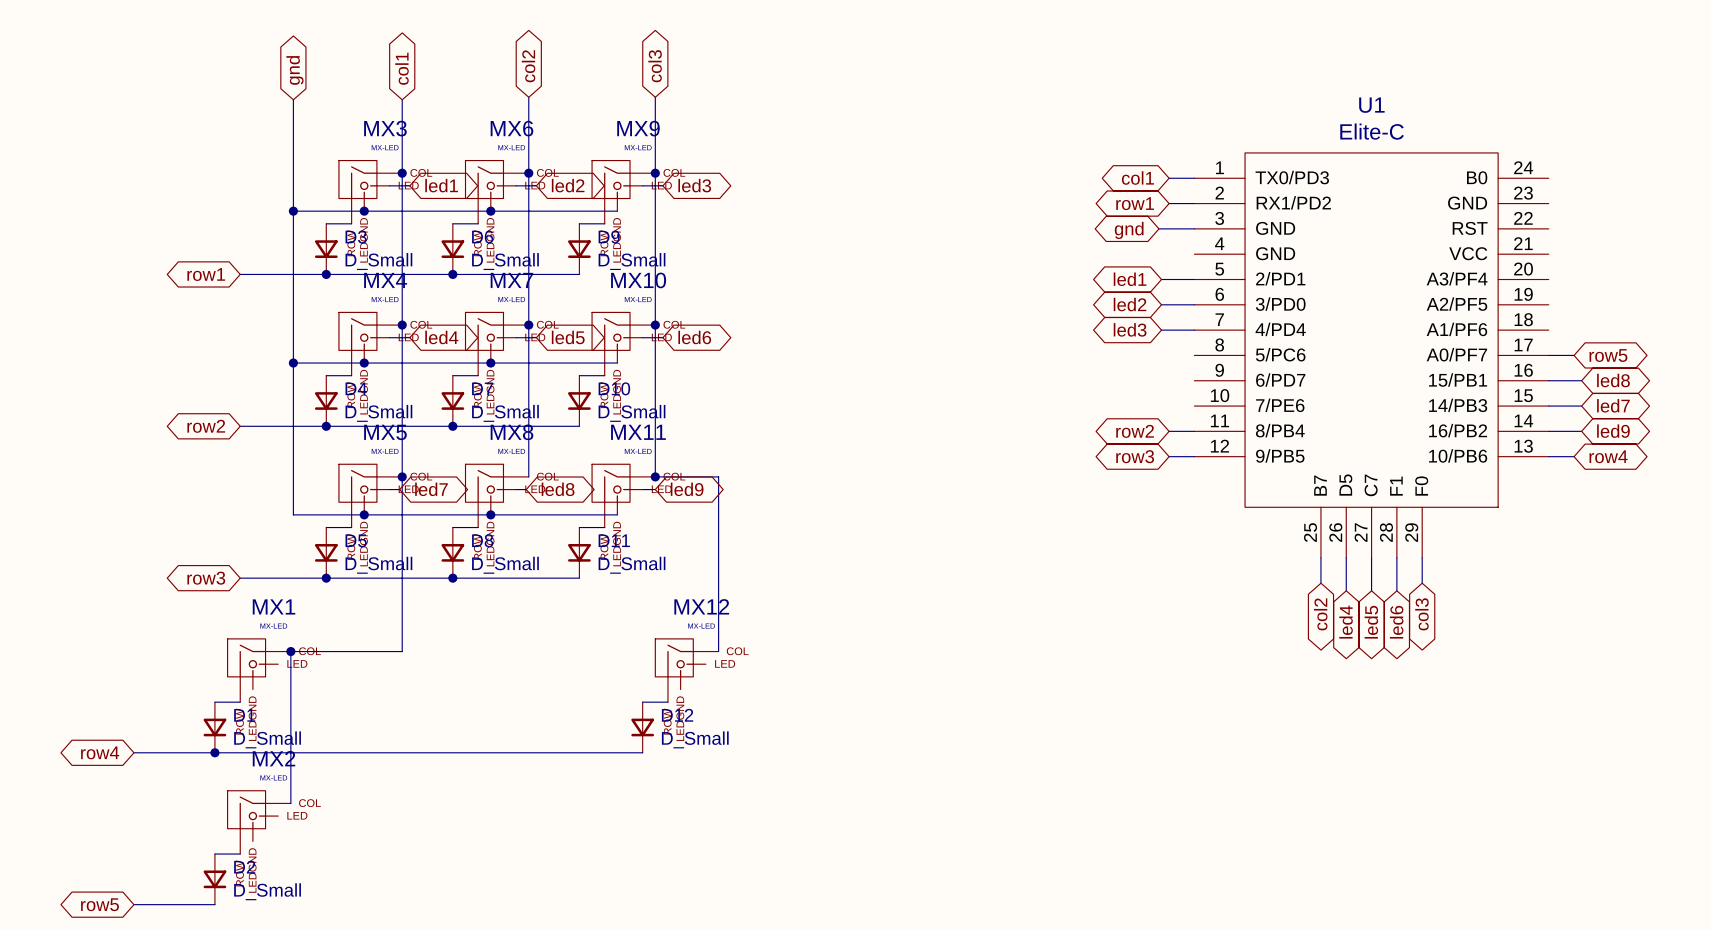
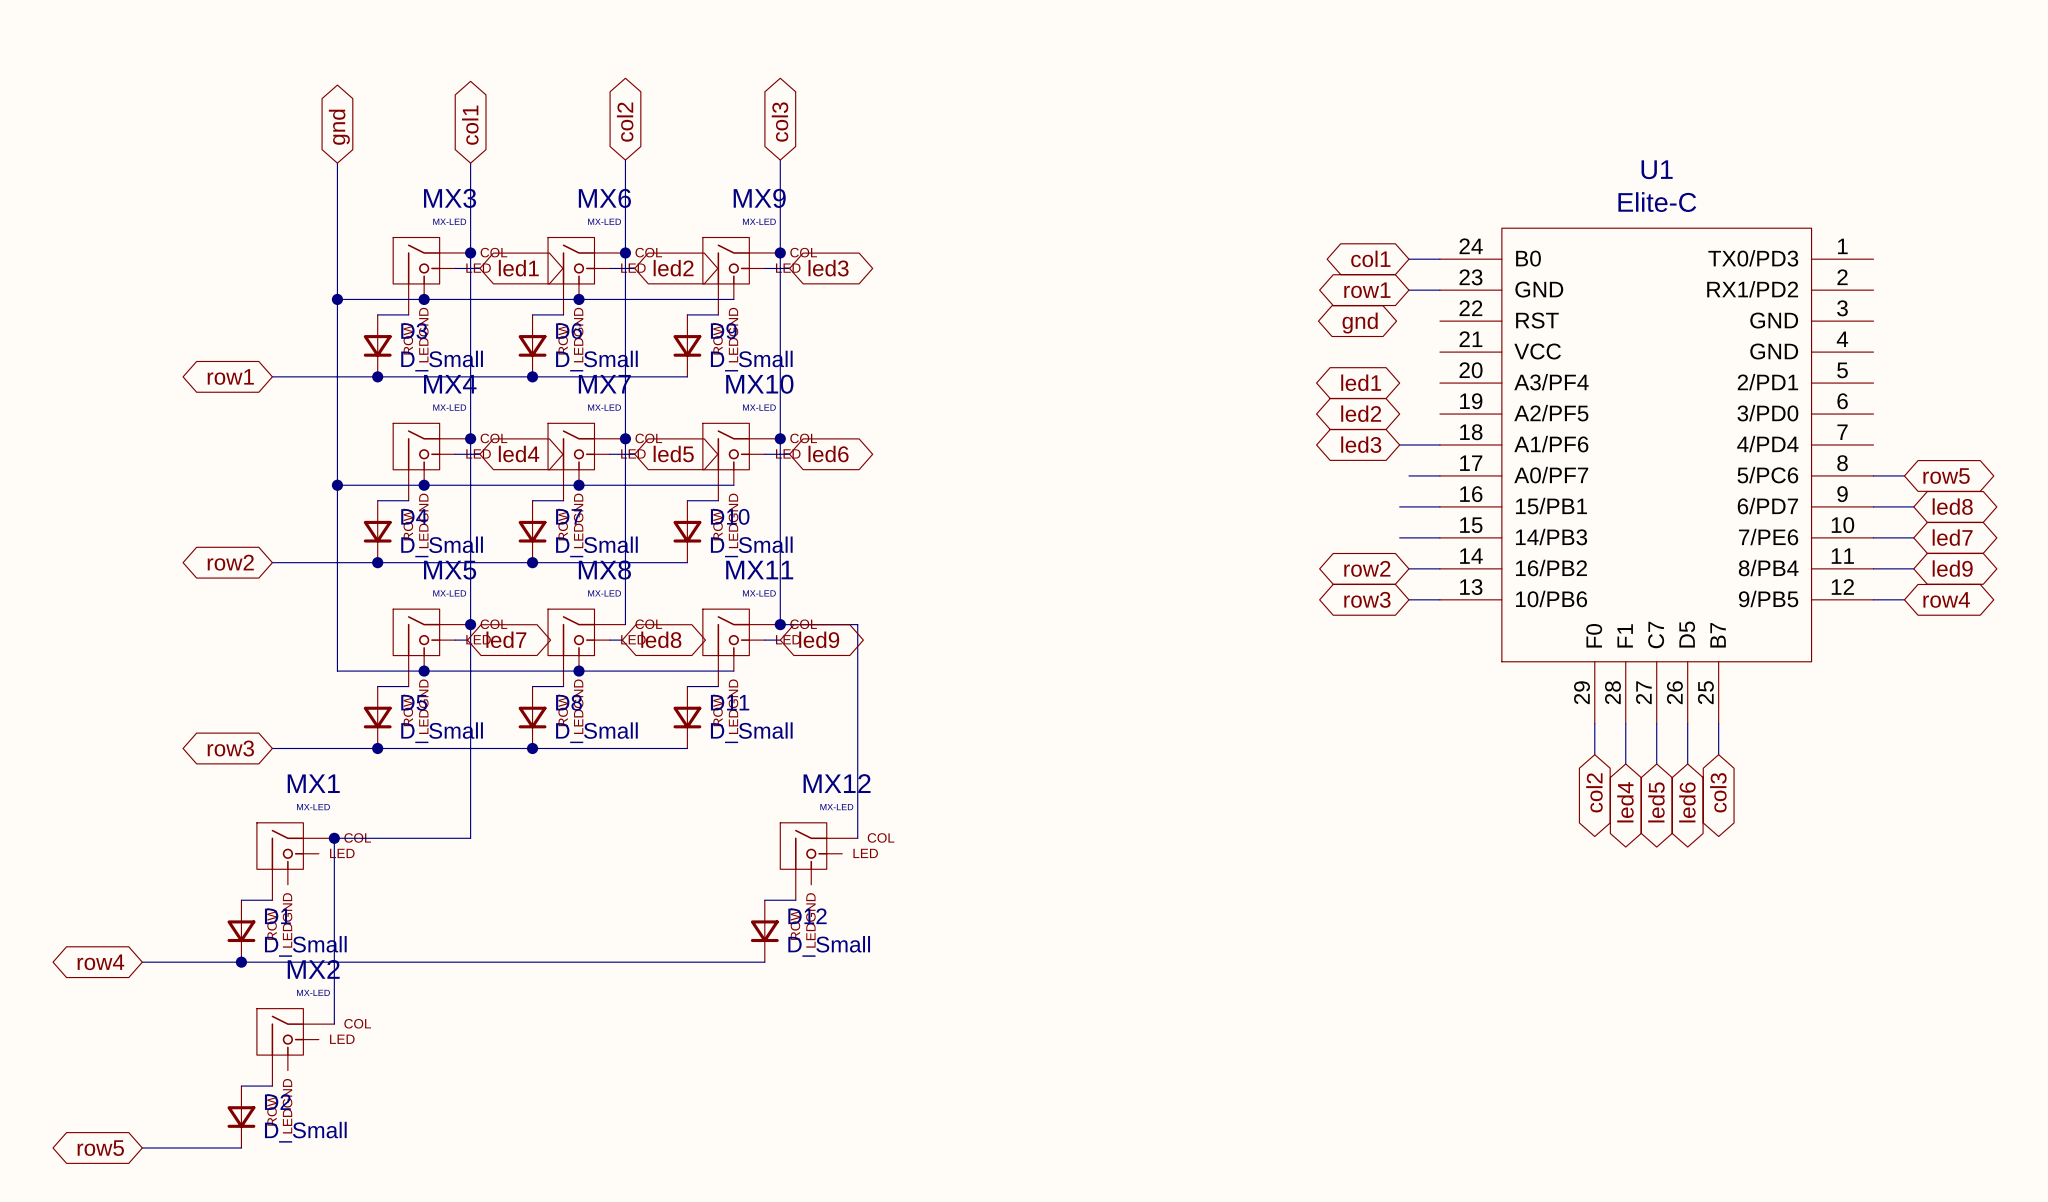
wire: (1158, 228) (1194, 228) -> none
wire: (1161, 279) (1194, 279) -> (1399, 506) (1439, 506)
wire: (1161, 304) (1194, 304) -> (1399, 537) (1439, 537)
U1 flip: as is (1371, 330) -> left-right (1656, 444)
wire: none -> (1408, 475) (1439, 475)

